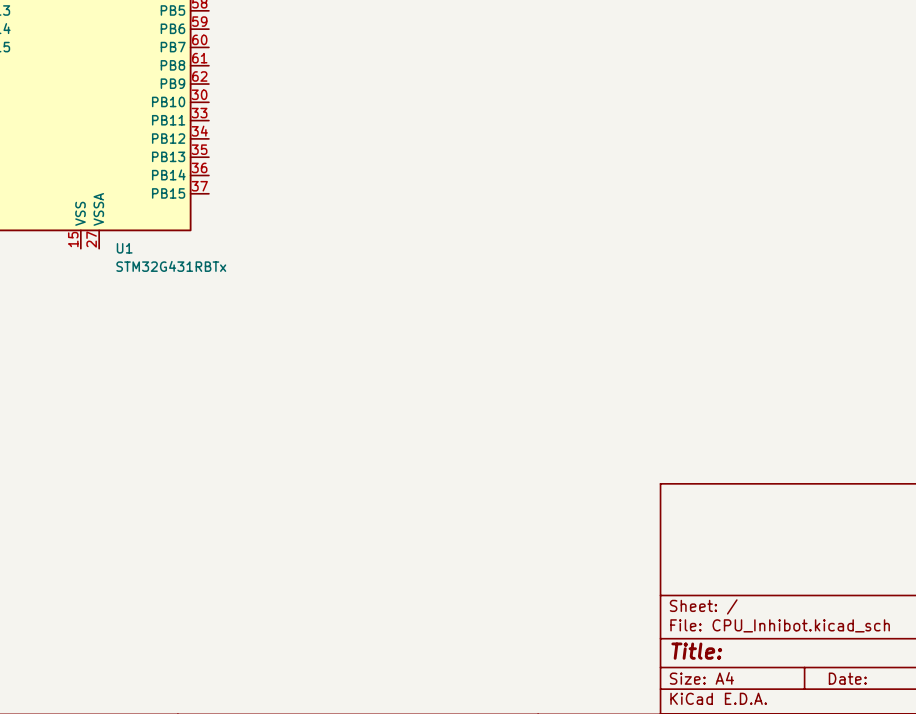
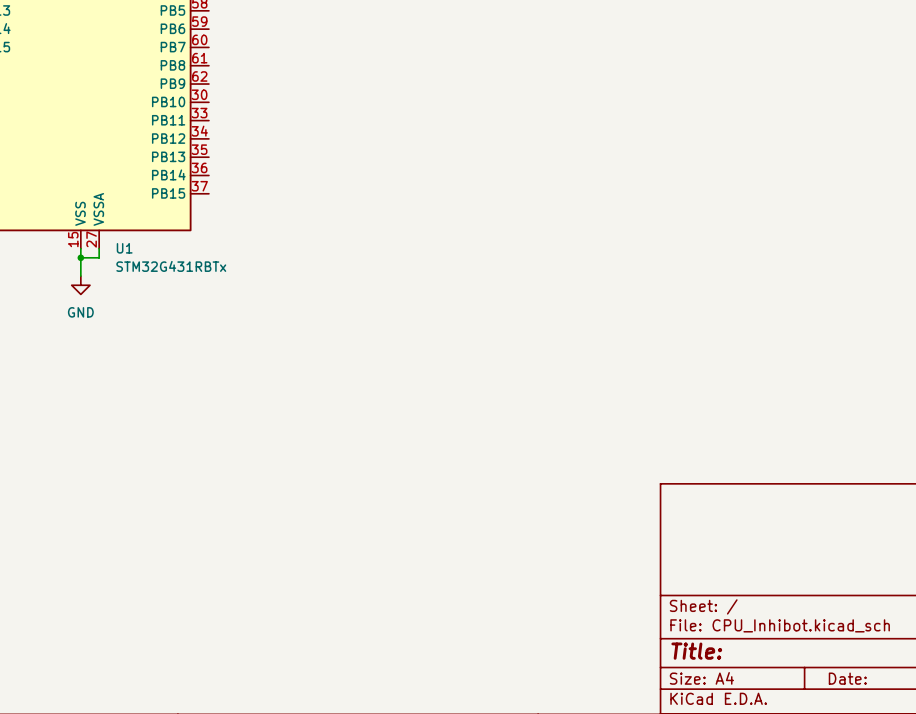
wire: none -> (80, 248) (80, 276)
wire: none -> (99, 248) (99, 257) (80, 257)
junction: none -> (80, 257)
power symbol: none -> GND (80, 285)

